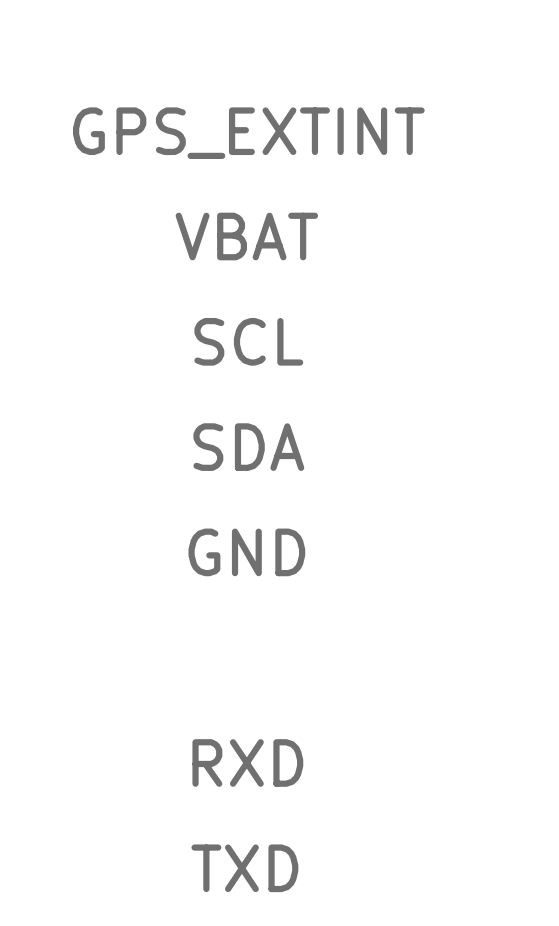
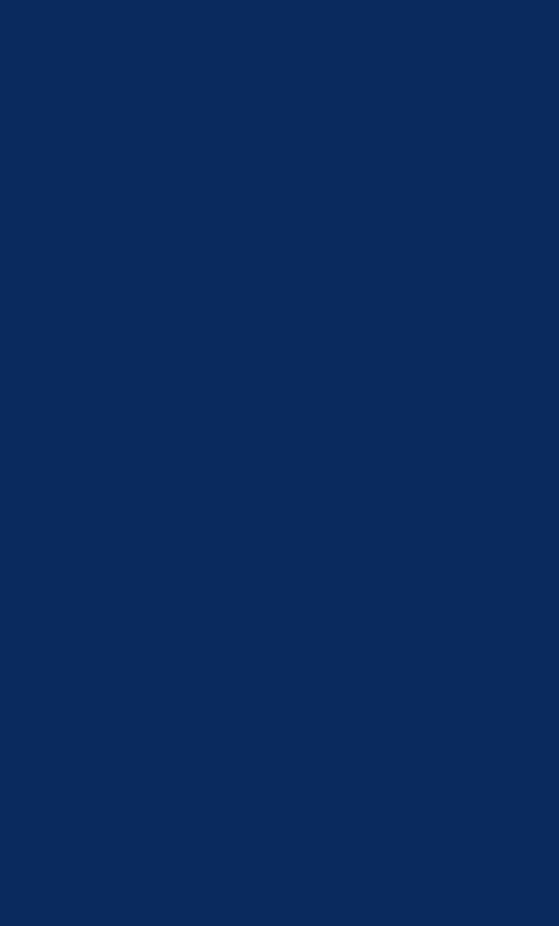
text: GPS_EXTINT (248, 133) -> none
text: VBAT (246, 236) -> none
text: SCL (248, 341) -> none
text: SDA (248, 447) -> none
text: GND (246, 552) -> none
text: RXD (247, 762) -> none
text: TXD (244, 868) -> none

